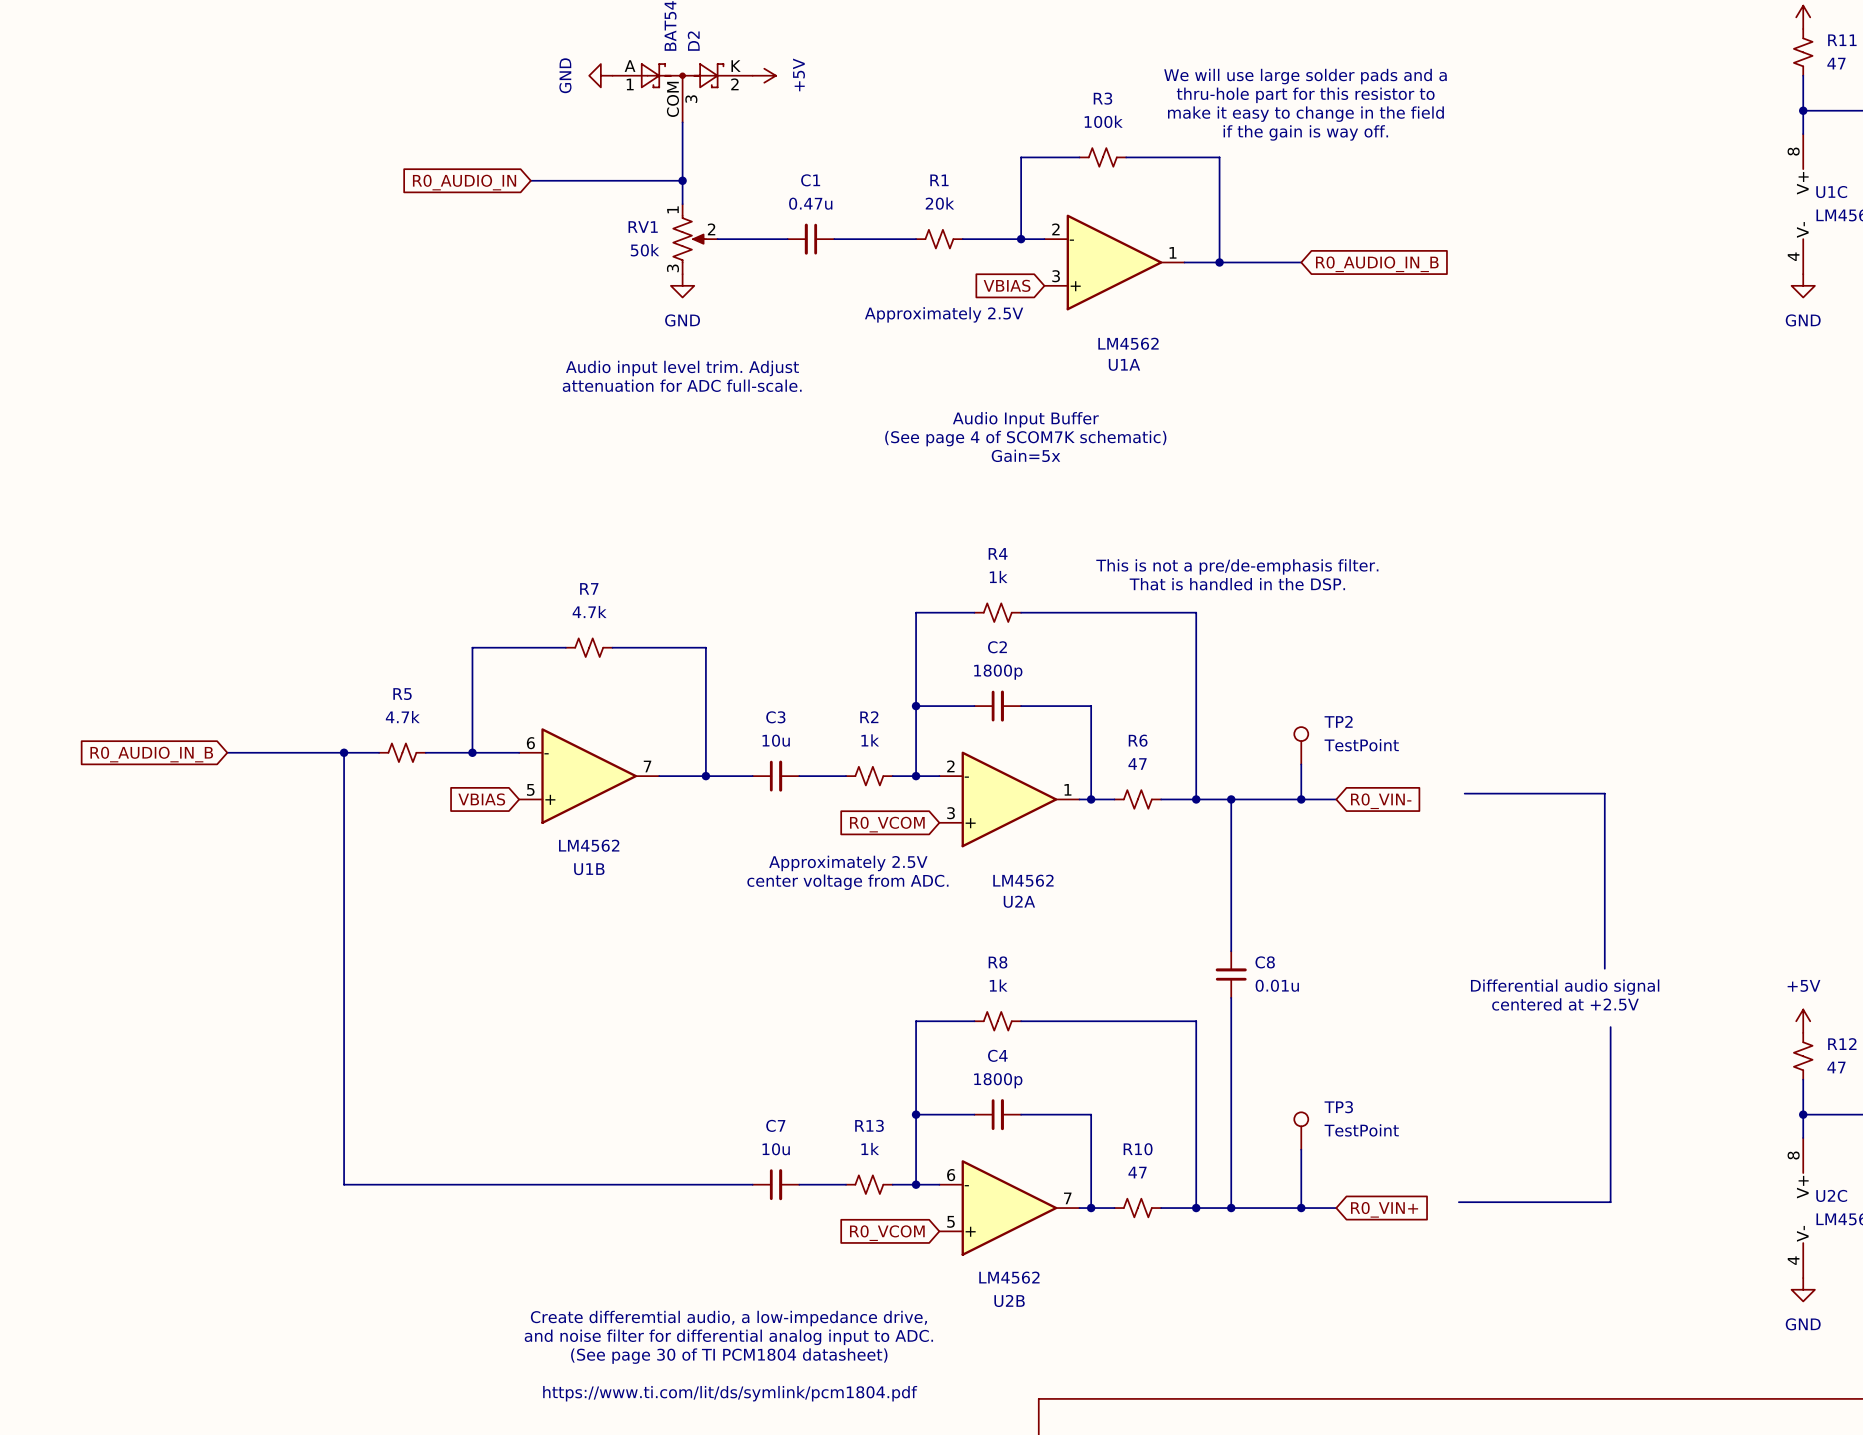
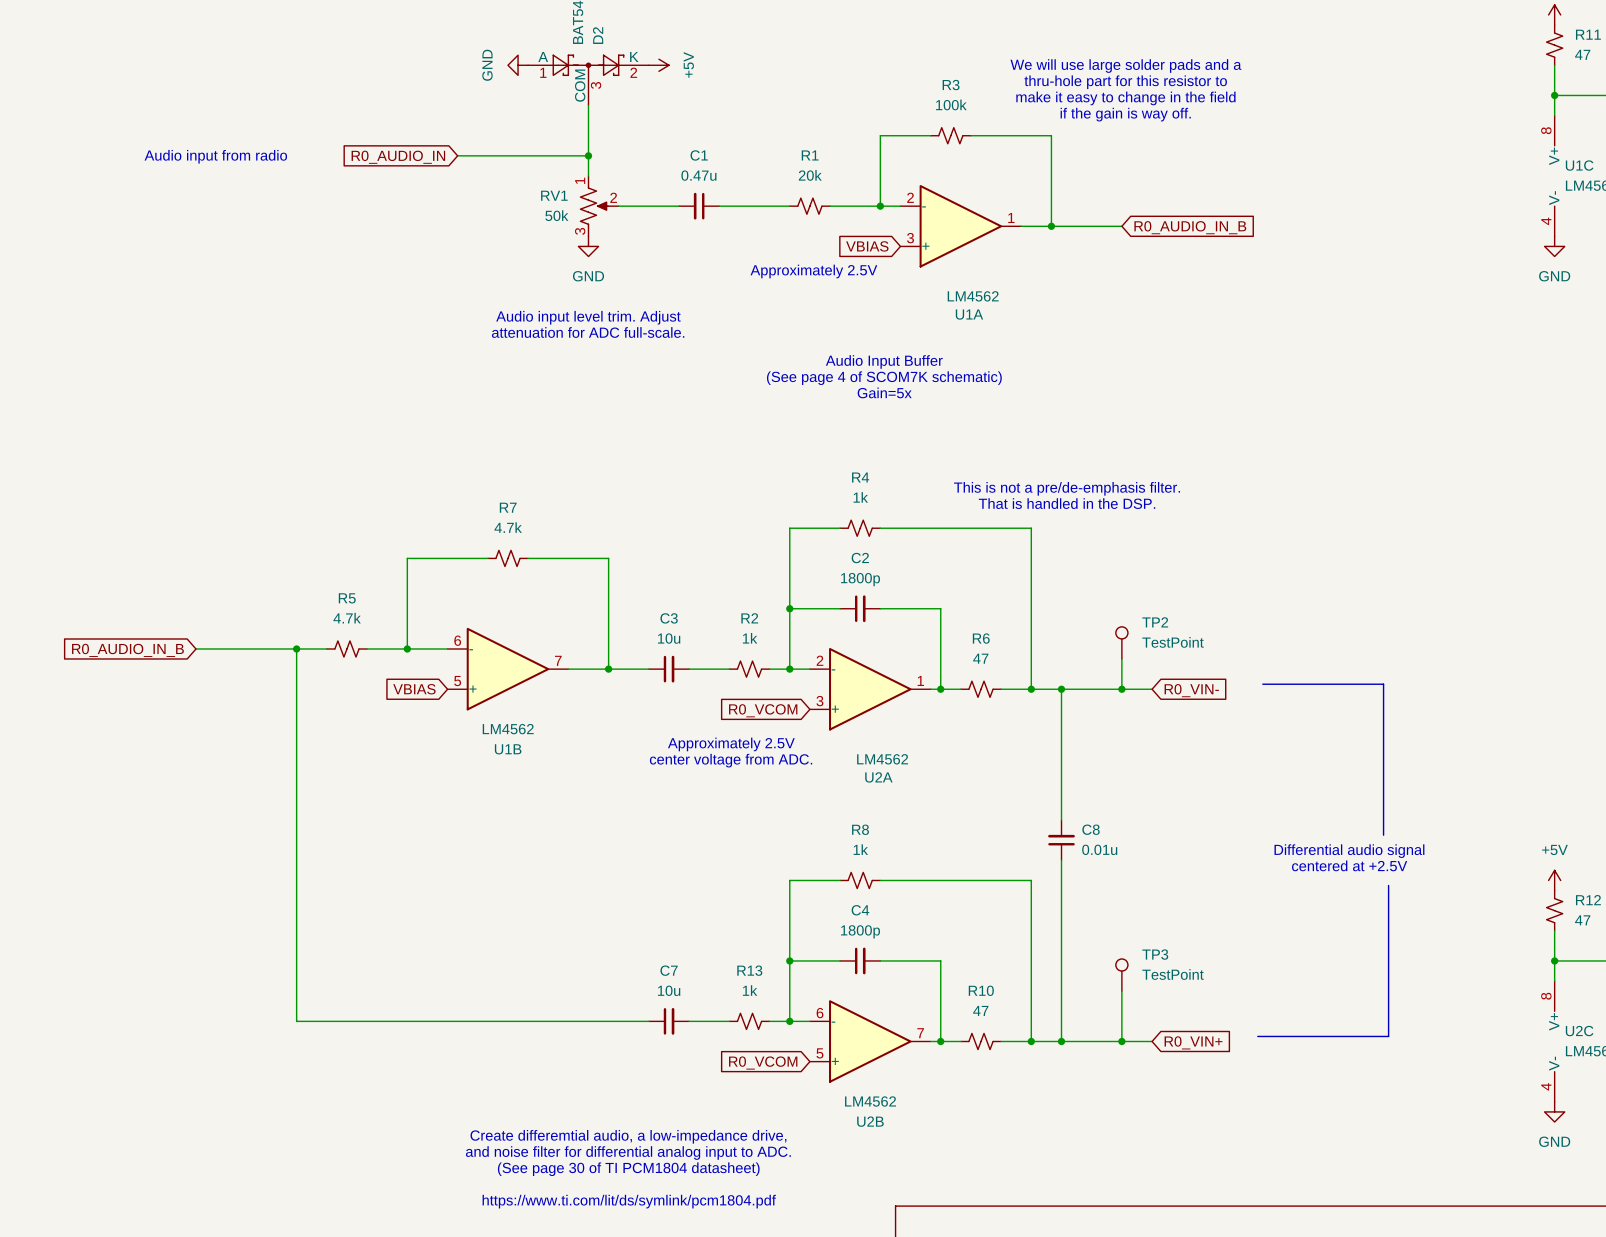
text: none -> Audio input from radio (215, 156)

